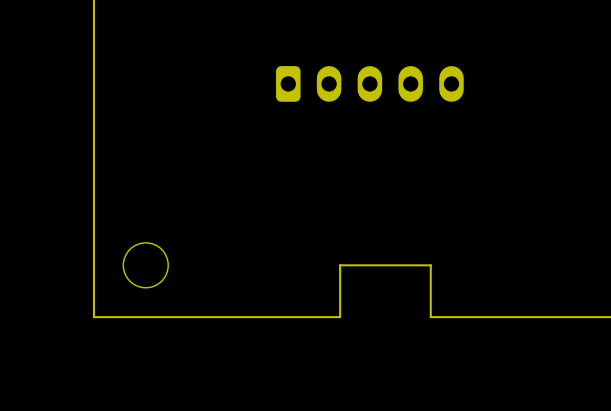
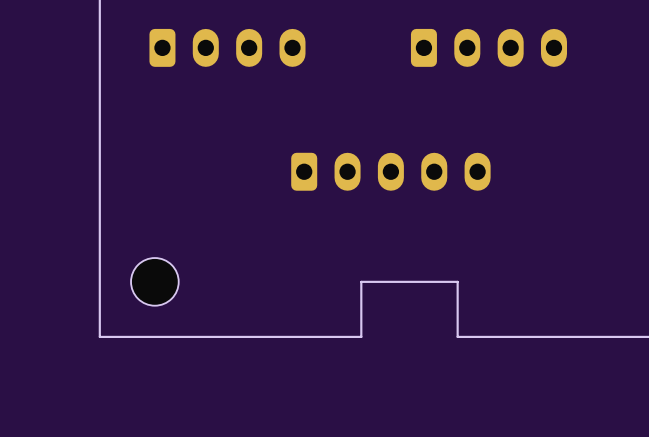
part: none -> (227, 47)
part: none -> (488, 47)
part position: (369, 83) -> (390, 171)

